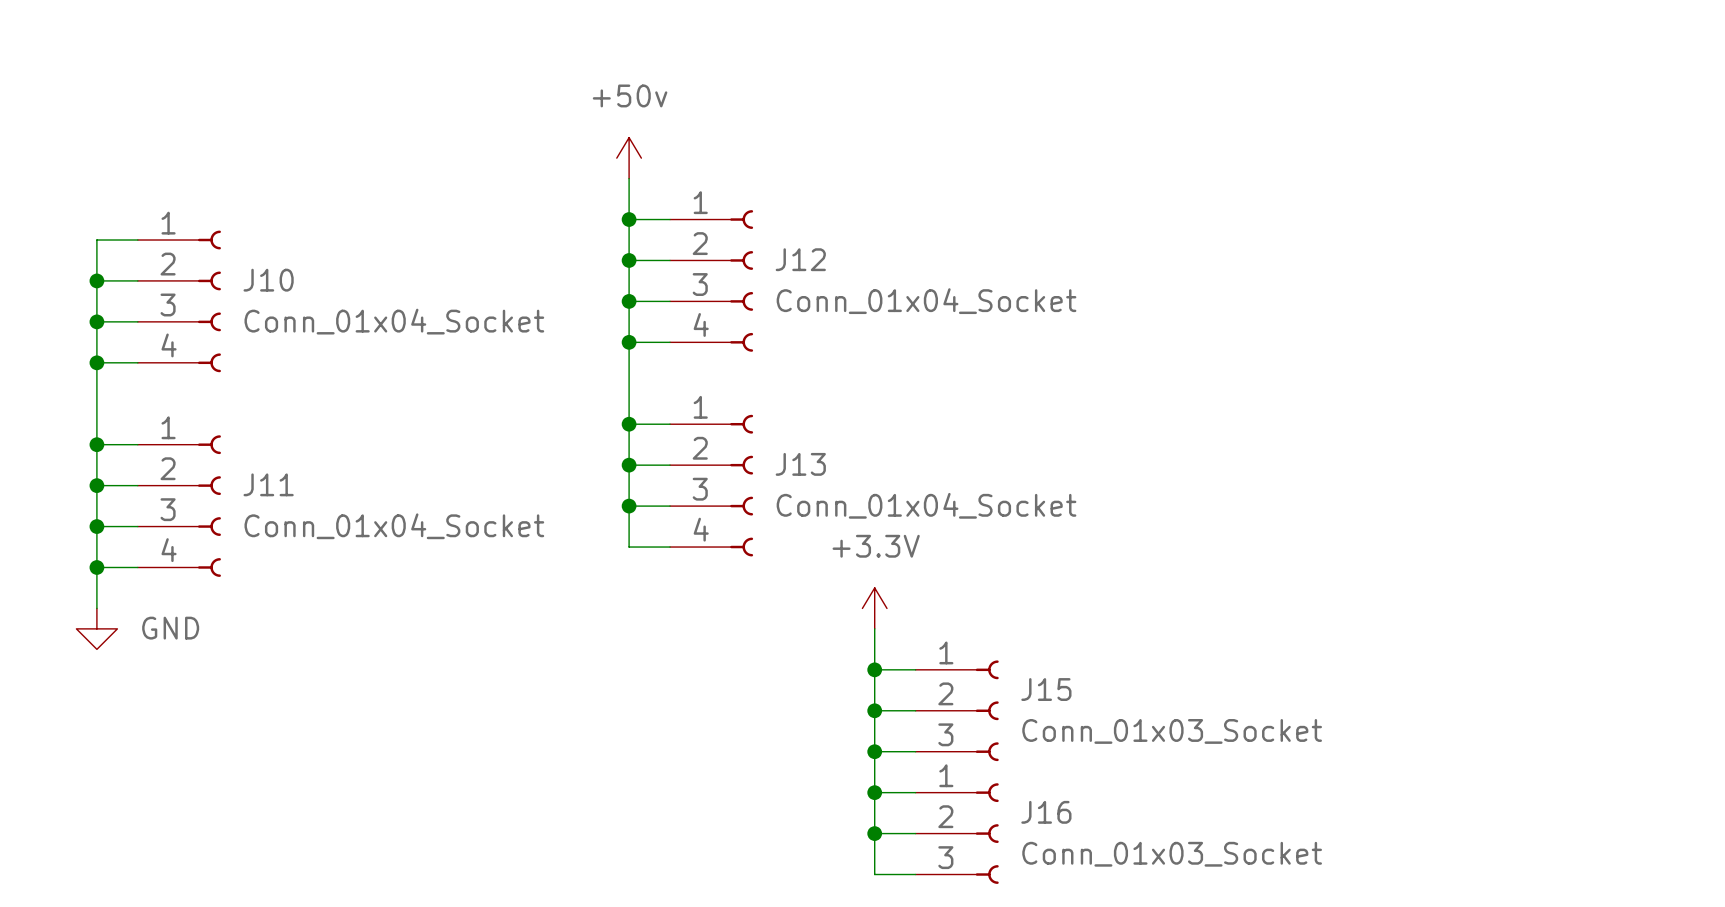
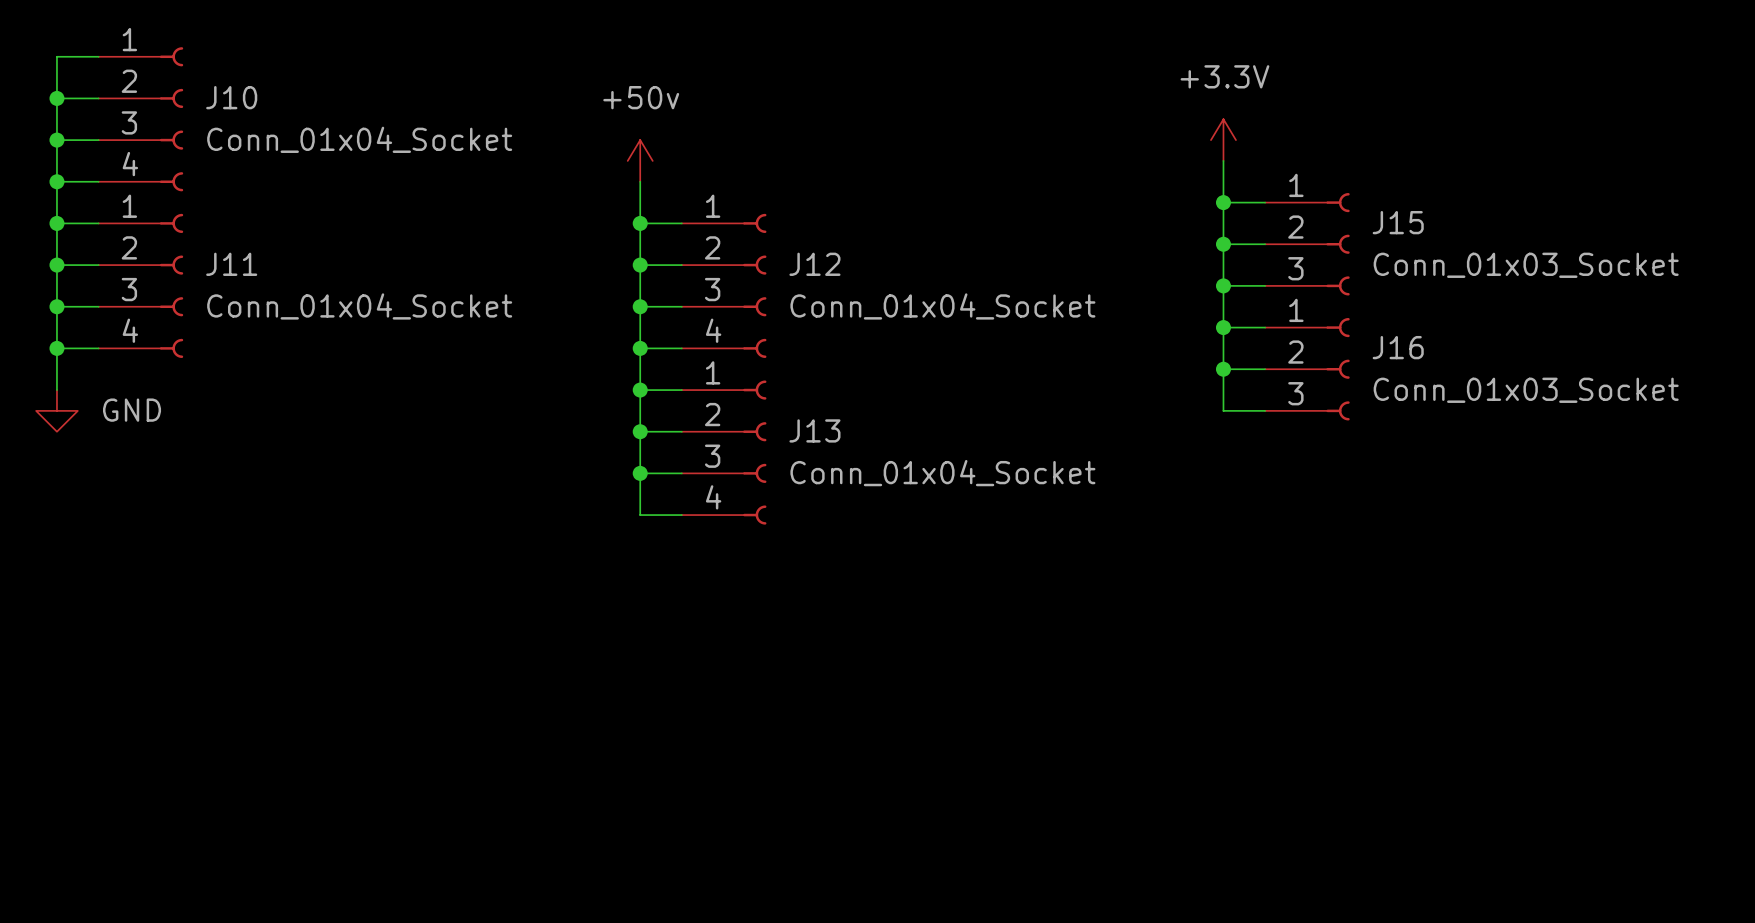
wire: none -> (98, 56) (56, 56) (56, 390)
junction: none -> (56, 98)
junction: none -> (56, 140)
power symbol: none -> +3.3V (1223, 140)
wire: none -> (1223, 160) (1223, 410) (1265, 410)
junction: none -> (56, 181)
wire: none -> (1223, 202) (1265, 202)
junction: none -> (1223, 202)
junction: none -> (56, 223)
wire: (137, 240) (96, 240) (96, 608) -> none
wire: none -> (1223, 244) (1265, 244)
junction: none -> (1223, 244)
junction: none -> (56, 265)
wire: (96, 280) (137, 280) -> (56, 98) (98, 98)
junction: (96, 280) -> none
wire: none -> (1223, 285) (1265, 285)
junction: none -> (1223, 285)
junction: none -> (56, 306)
J10 position: (179, 301) -> (140, 119)
wire: (96, 321) (137, 321) -> (56, 140) (98, 140)
junction: (96, 321) -> none
wire: none -> (1223, 327) (1265, 327)
junction: none -> (1223, 327)
junction: none -> (56, 348)
wire: (96, 362) (137, 362) -> (56, 181) (98, 181)
junction: (96, 362) -> none
wire: none -> (1223, 369) (1265, 369)
junction: none -> (1223, 369)
junction: none -> (640, 390)
wire: (96, 444) (137, 444) -> (56, 265) (98, 265)
junction: (96, 444) -> none
wire: (96, 485) (137, 485) -> (56, 306) (98, 306)
junction: (96, 485) -> none
J13 position: (711, 485) -> (724, 452)
J11 position: (179, 506) -> (140, 285)
wire: (629, 506) (629, 547) (670, 547) -> none
junction: (629, 506) -> none
wire: (96, 526) (137, 526) -> (56, 348) (98, 348)
junction: (96, 526) -> none
wire: (96, 567) (137, 567) -> (56, 223) (98, 223)
junction: (96, 567) -> none
power symbol: +3.3V (874, 608) -> none
power symbol position: GND (96, 628) -> GND (56, 410)
wire: (874, 628) (874, 874) (915, 874) -> none
wire: (874, 669) (915, 669) -> (640, 390) (681, 390)
junction: (874, 669) -> none
wire: (874, 710) (915, 710) -> none
junction: (874, 710) -> none
J15 position: (957, 710) -> (1307, 244)
wire: (874, 751) (915, 751) -> none
junction: (874, 751) -> none
wire: (874, 792) (915, 792) -> none
junction: (874, 792) -> none
wire: (874, 833) (915, 833) -> none
junction: (874, 833) -> none
J16 position: (957, 833) -> (1307, 369)

